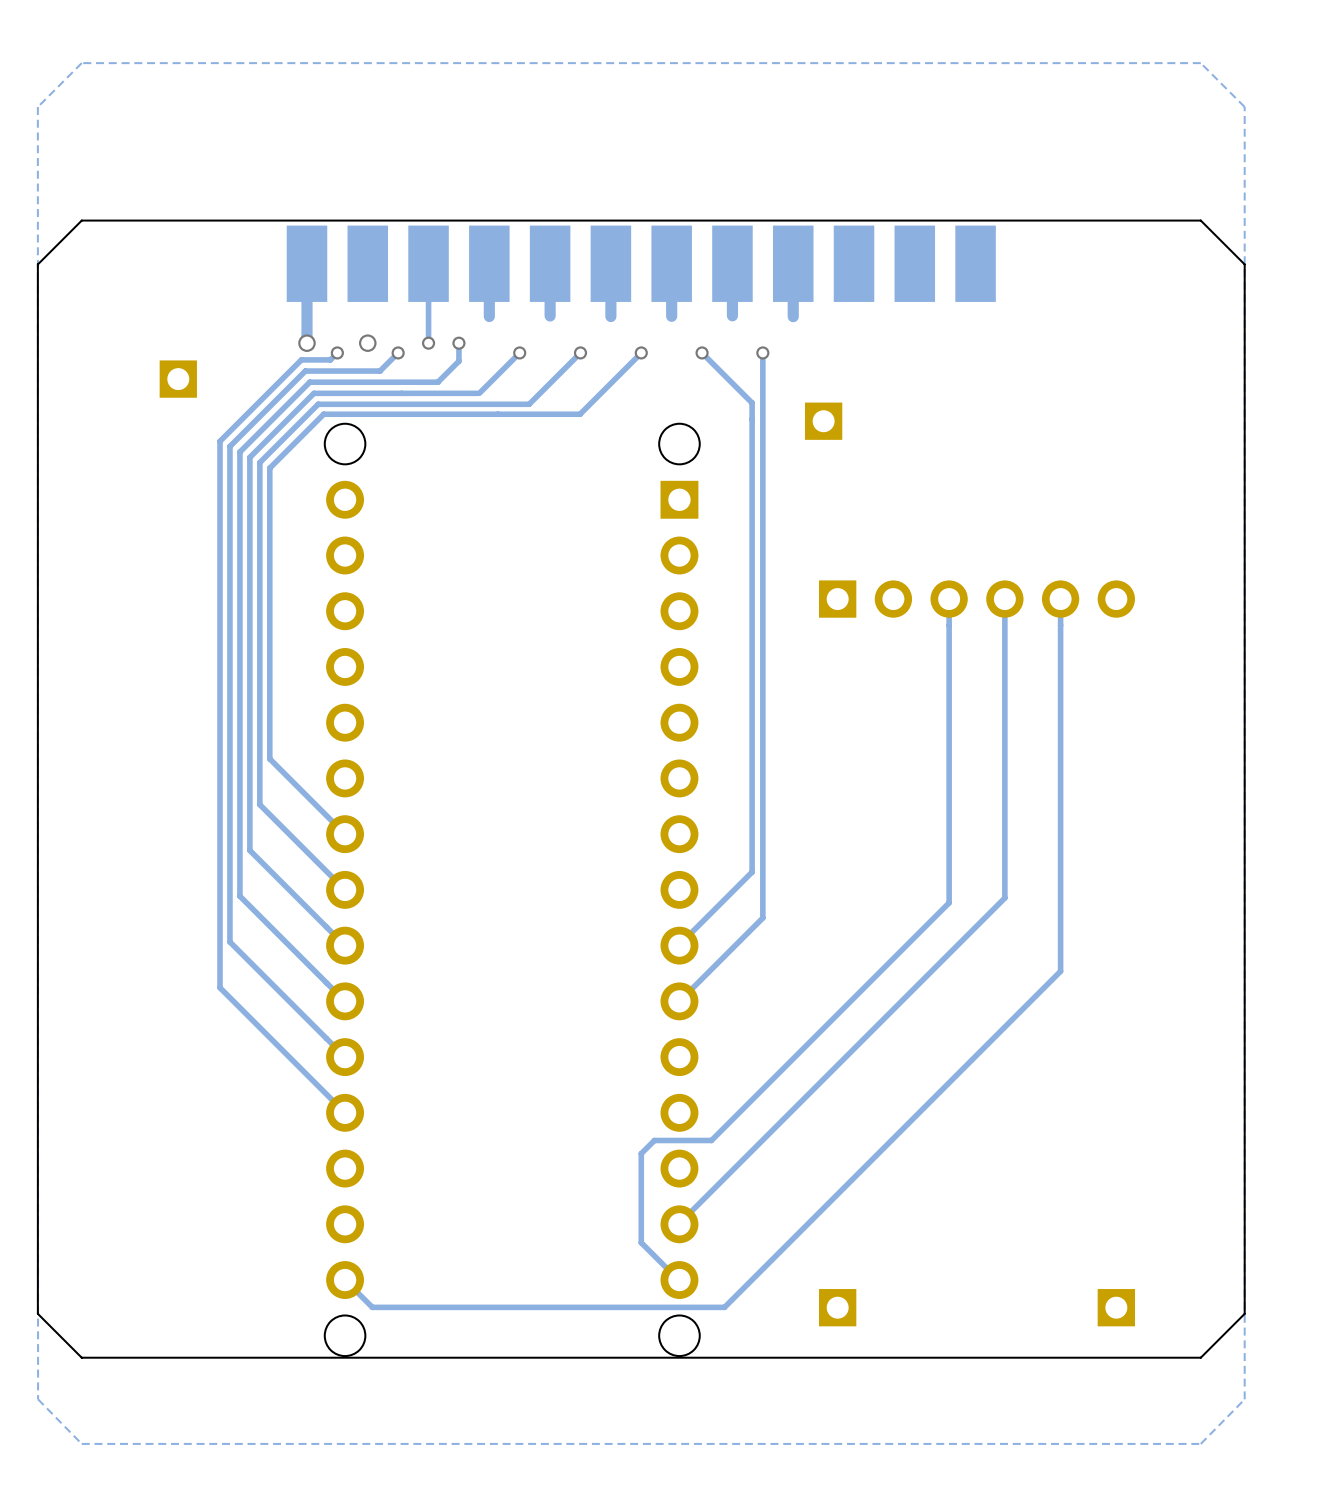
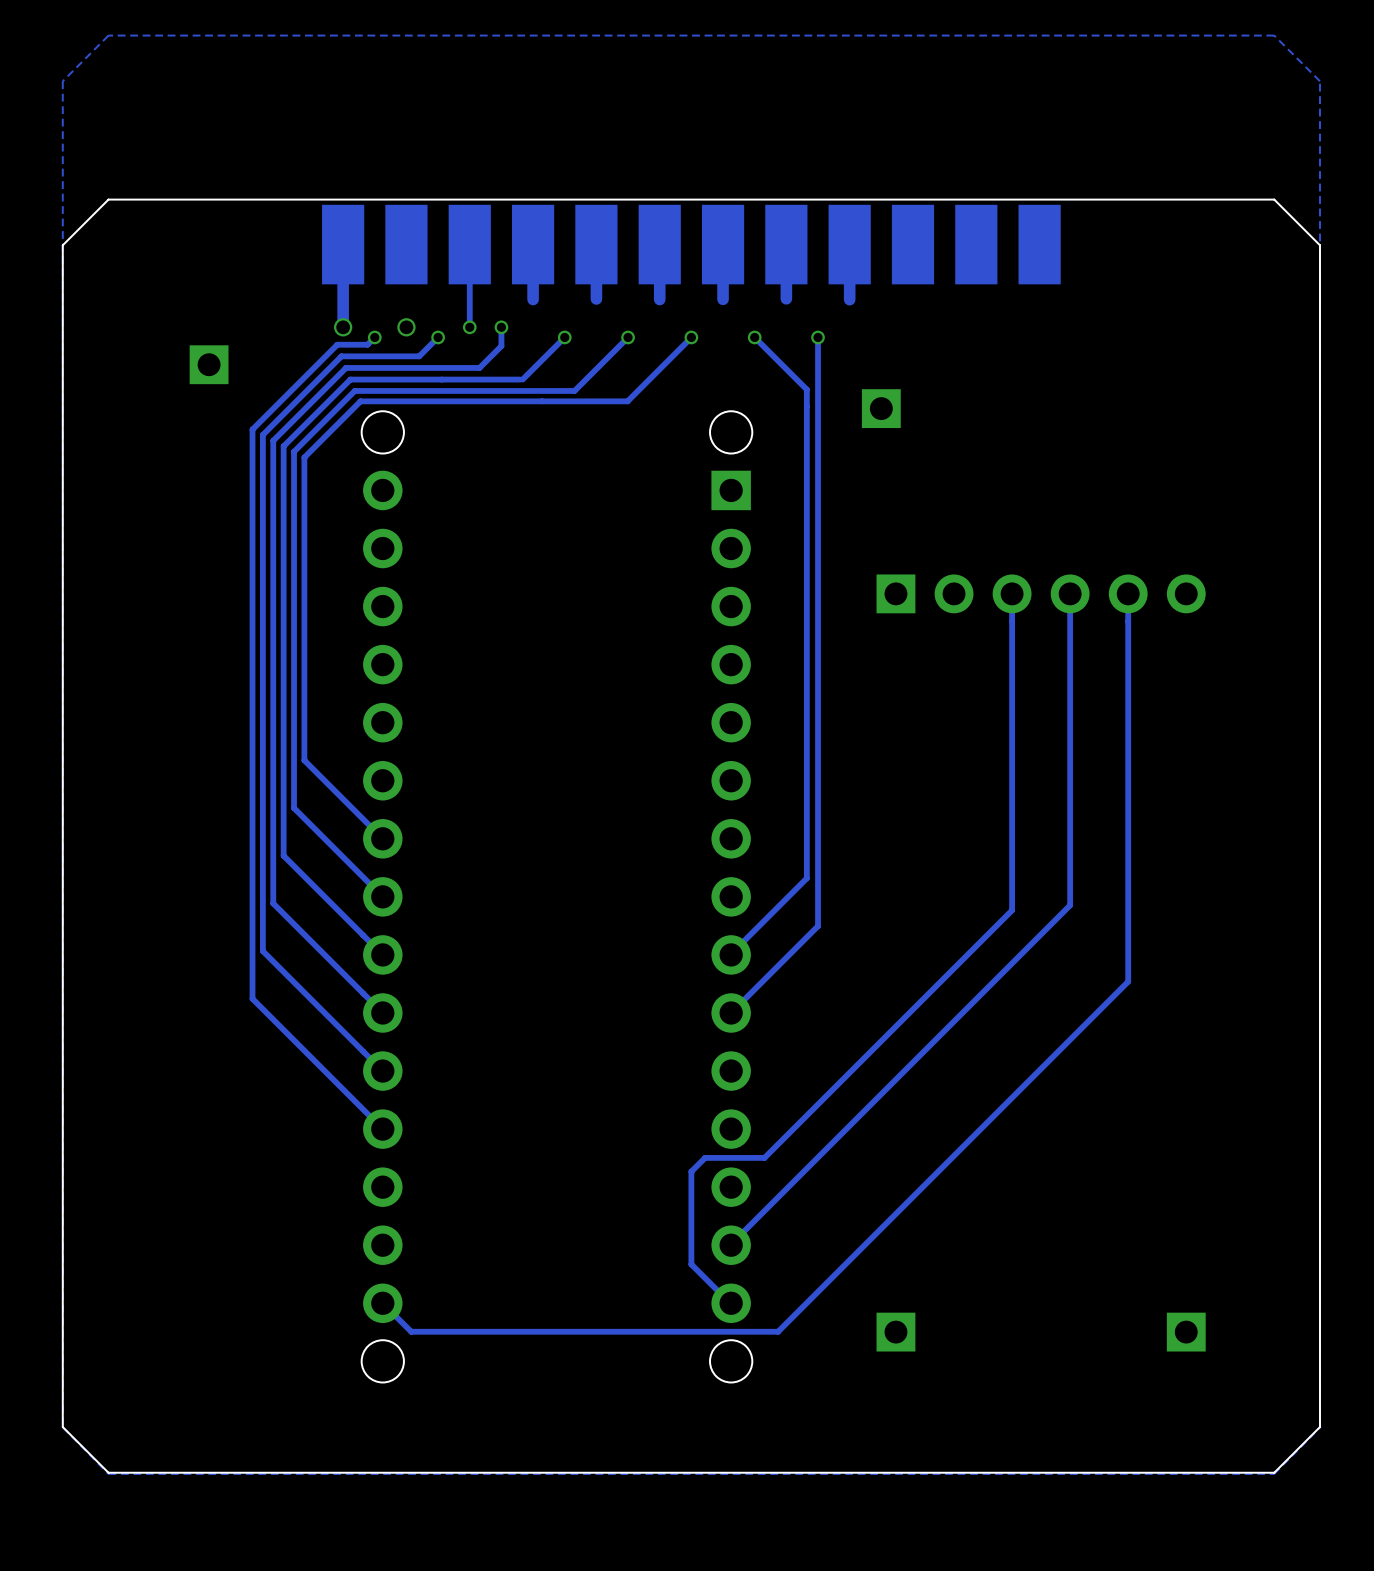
board edge: (1244, 1313) (1200, 1357) (81, 1357) (37, 1313) -> (1319, 1338) (1319, 1427) (1274, 1472) (108, 1472) (62, 1427) (62, 1338)

